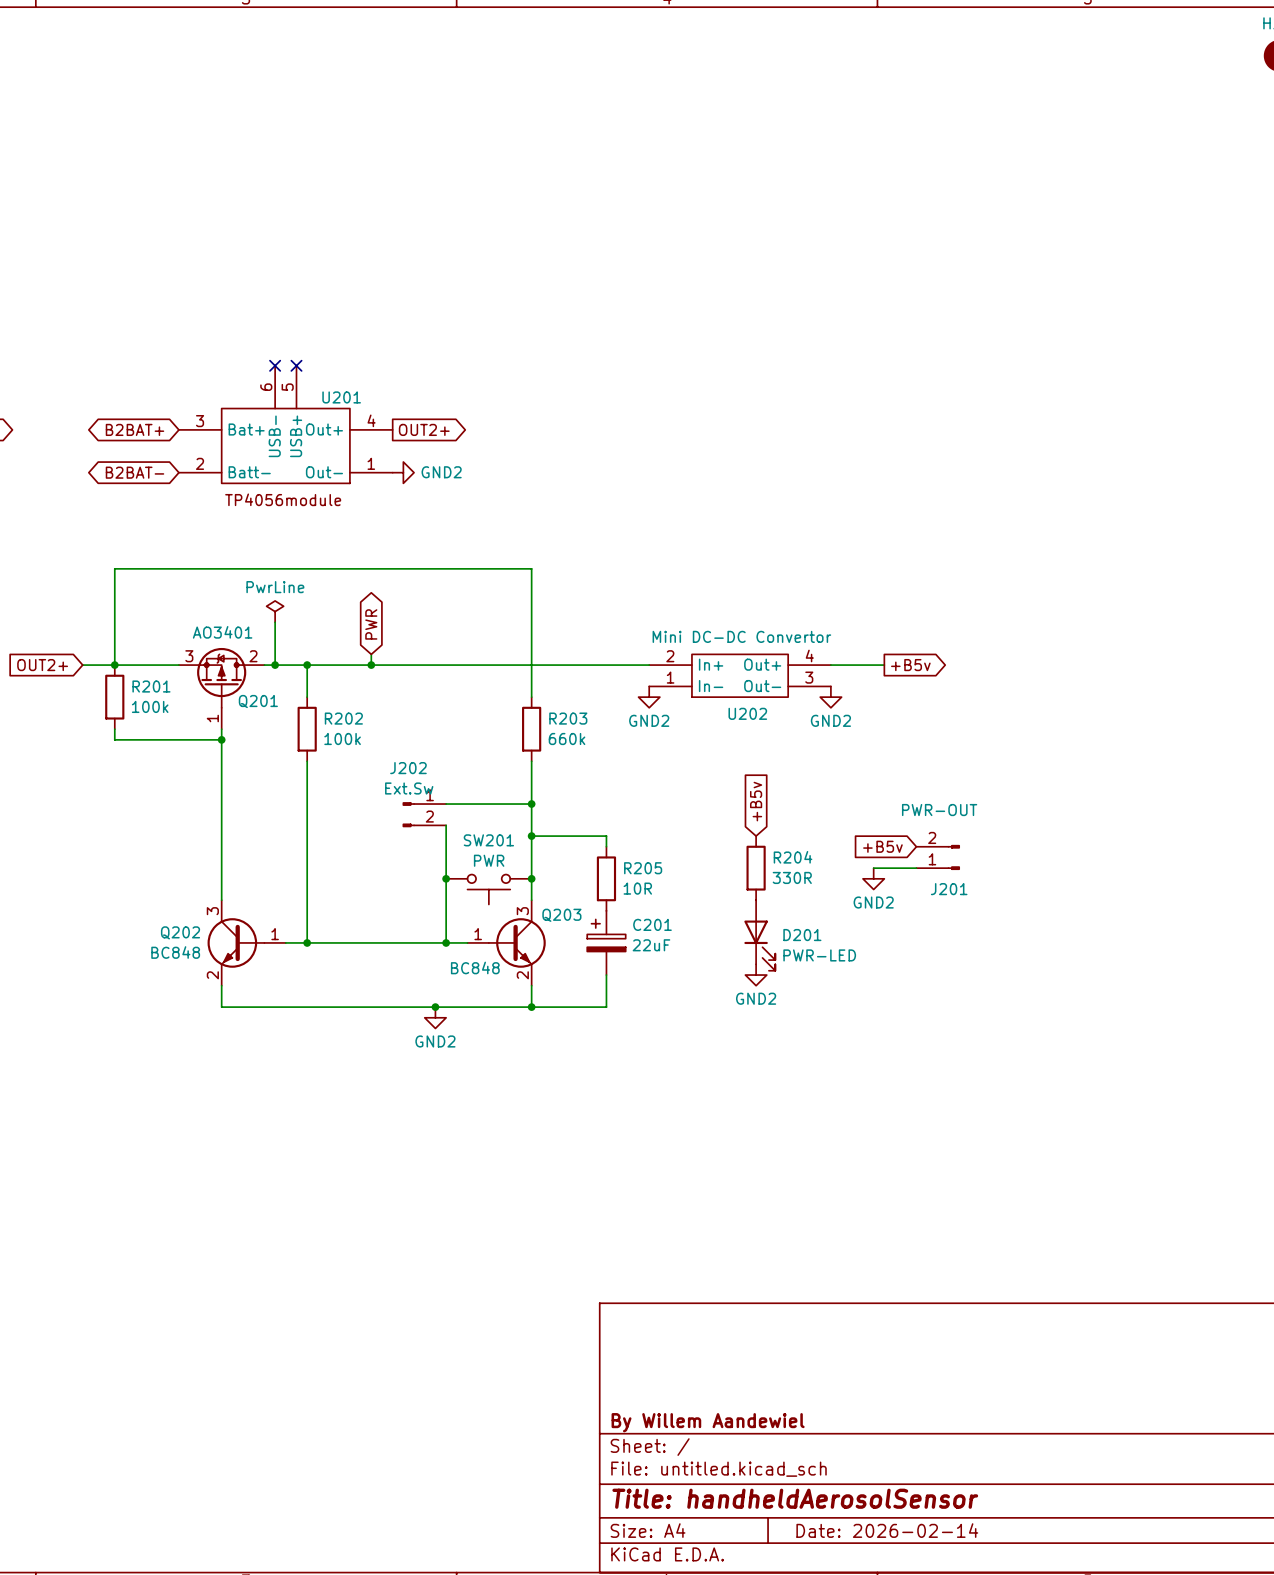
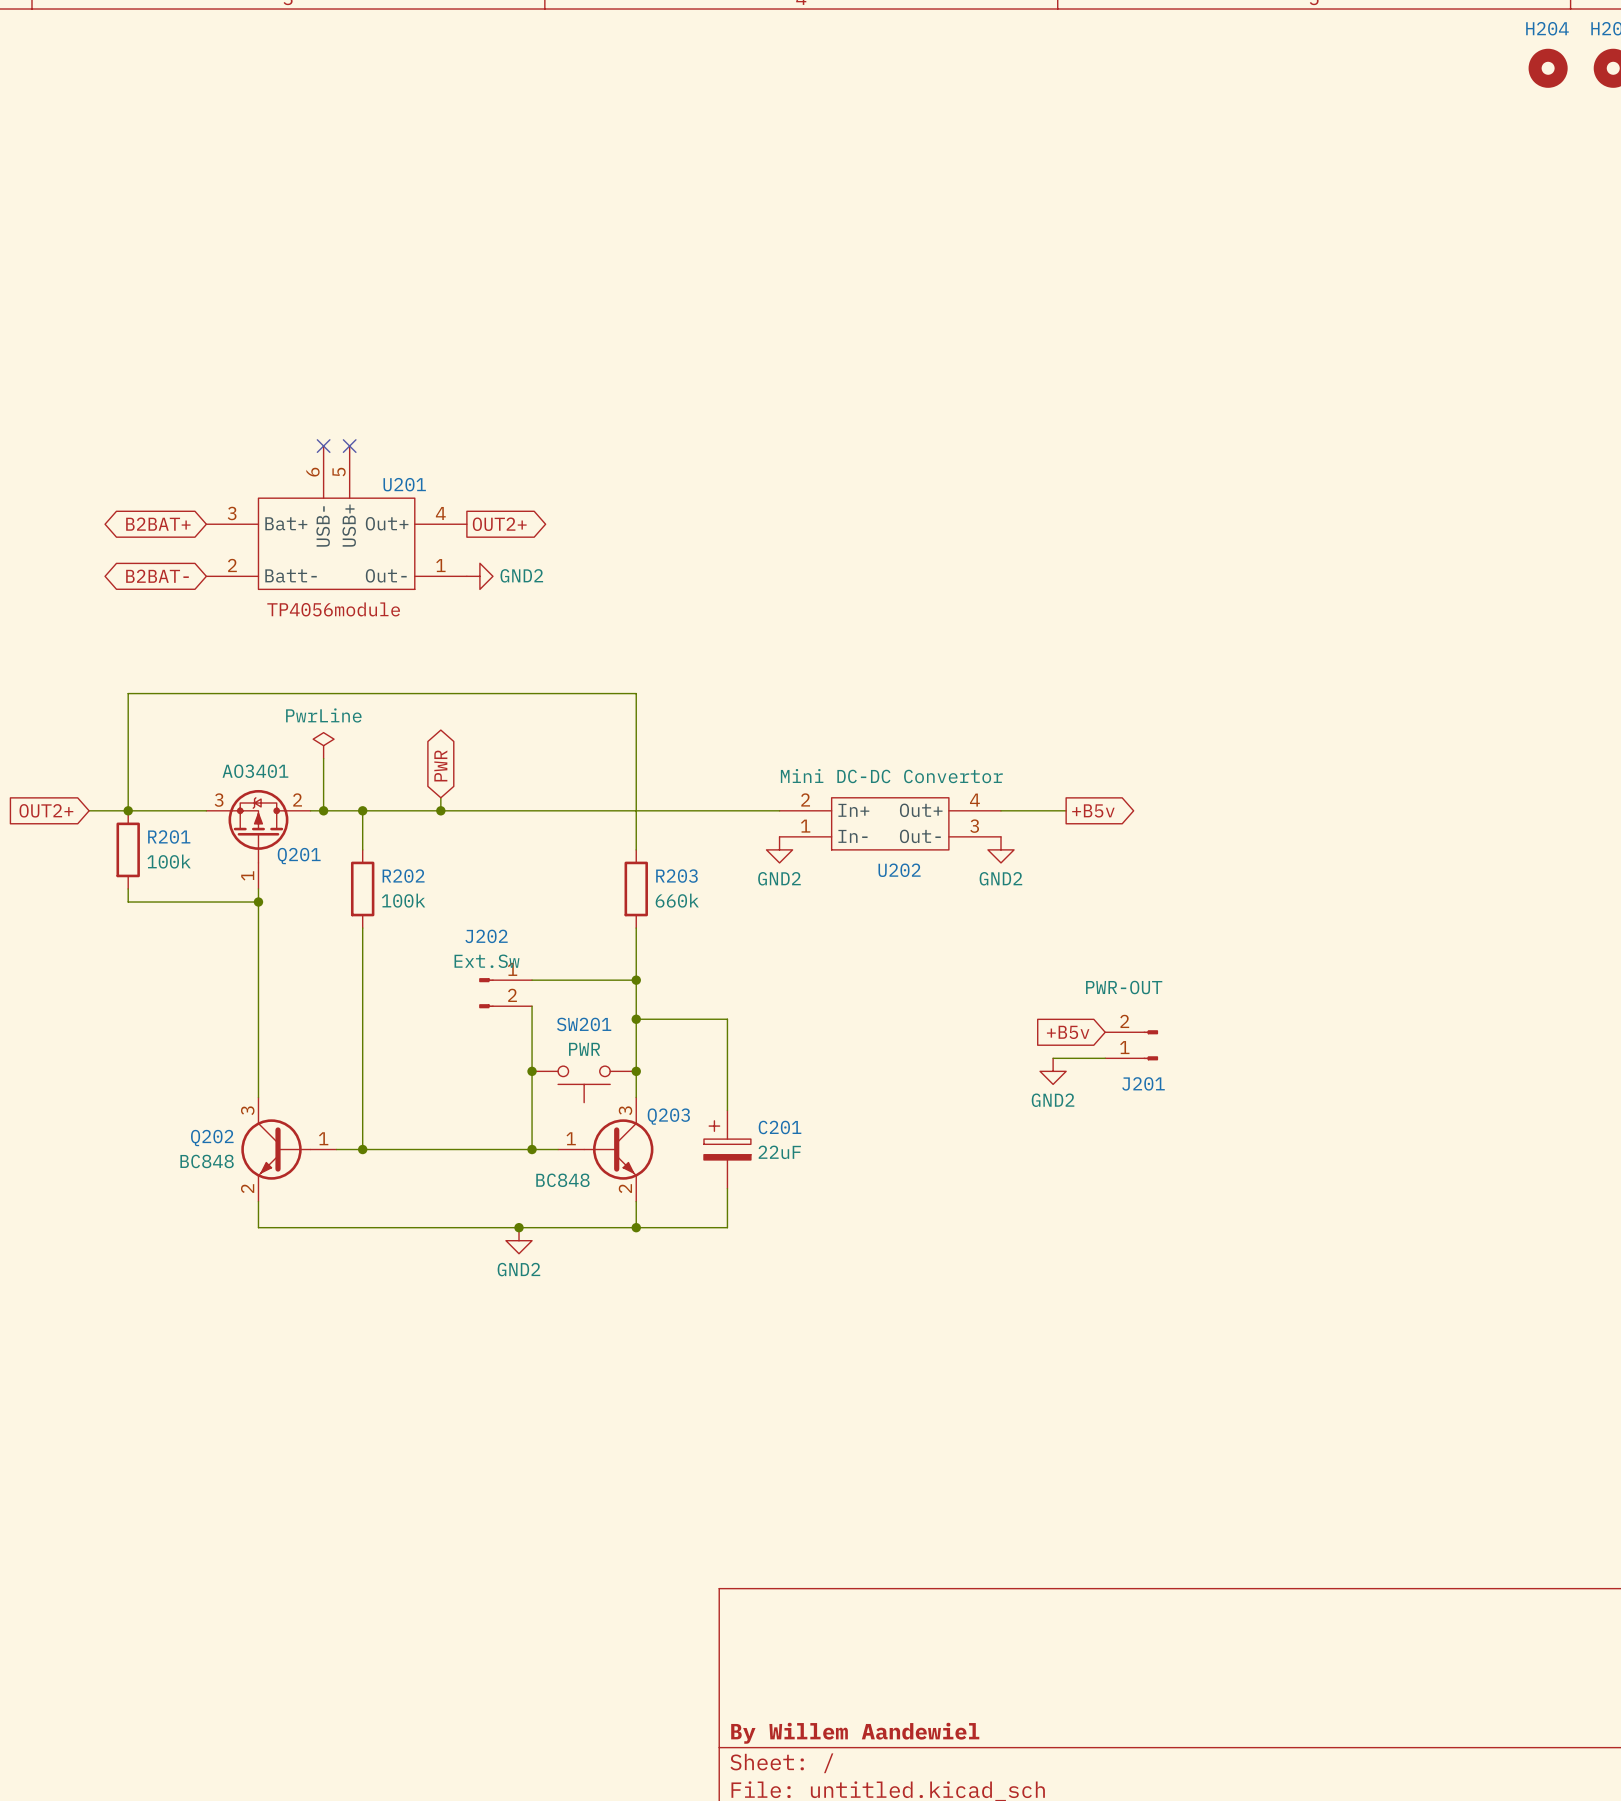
global label: +B5v (756, 801) -> none
wire: none -> (727, 1032) (727, 1110)
R204: 330R (756, 868) -> none
R205: 10R (606, 878) -> none
D201: PWR-LED (759, 935) -> none
power symbol: GND2 (756, 975) -> none

